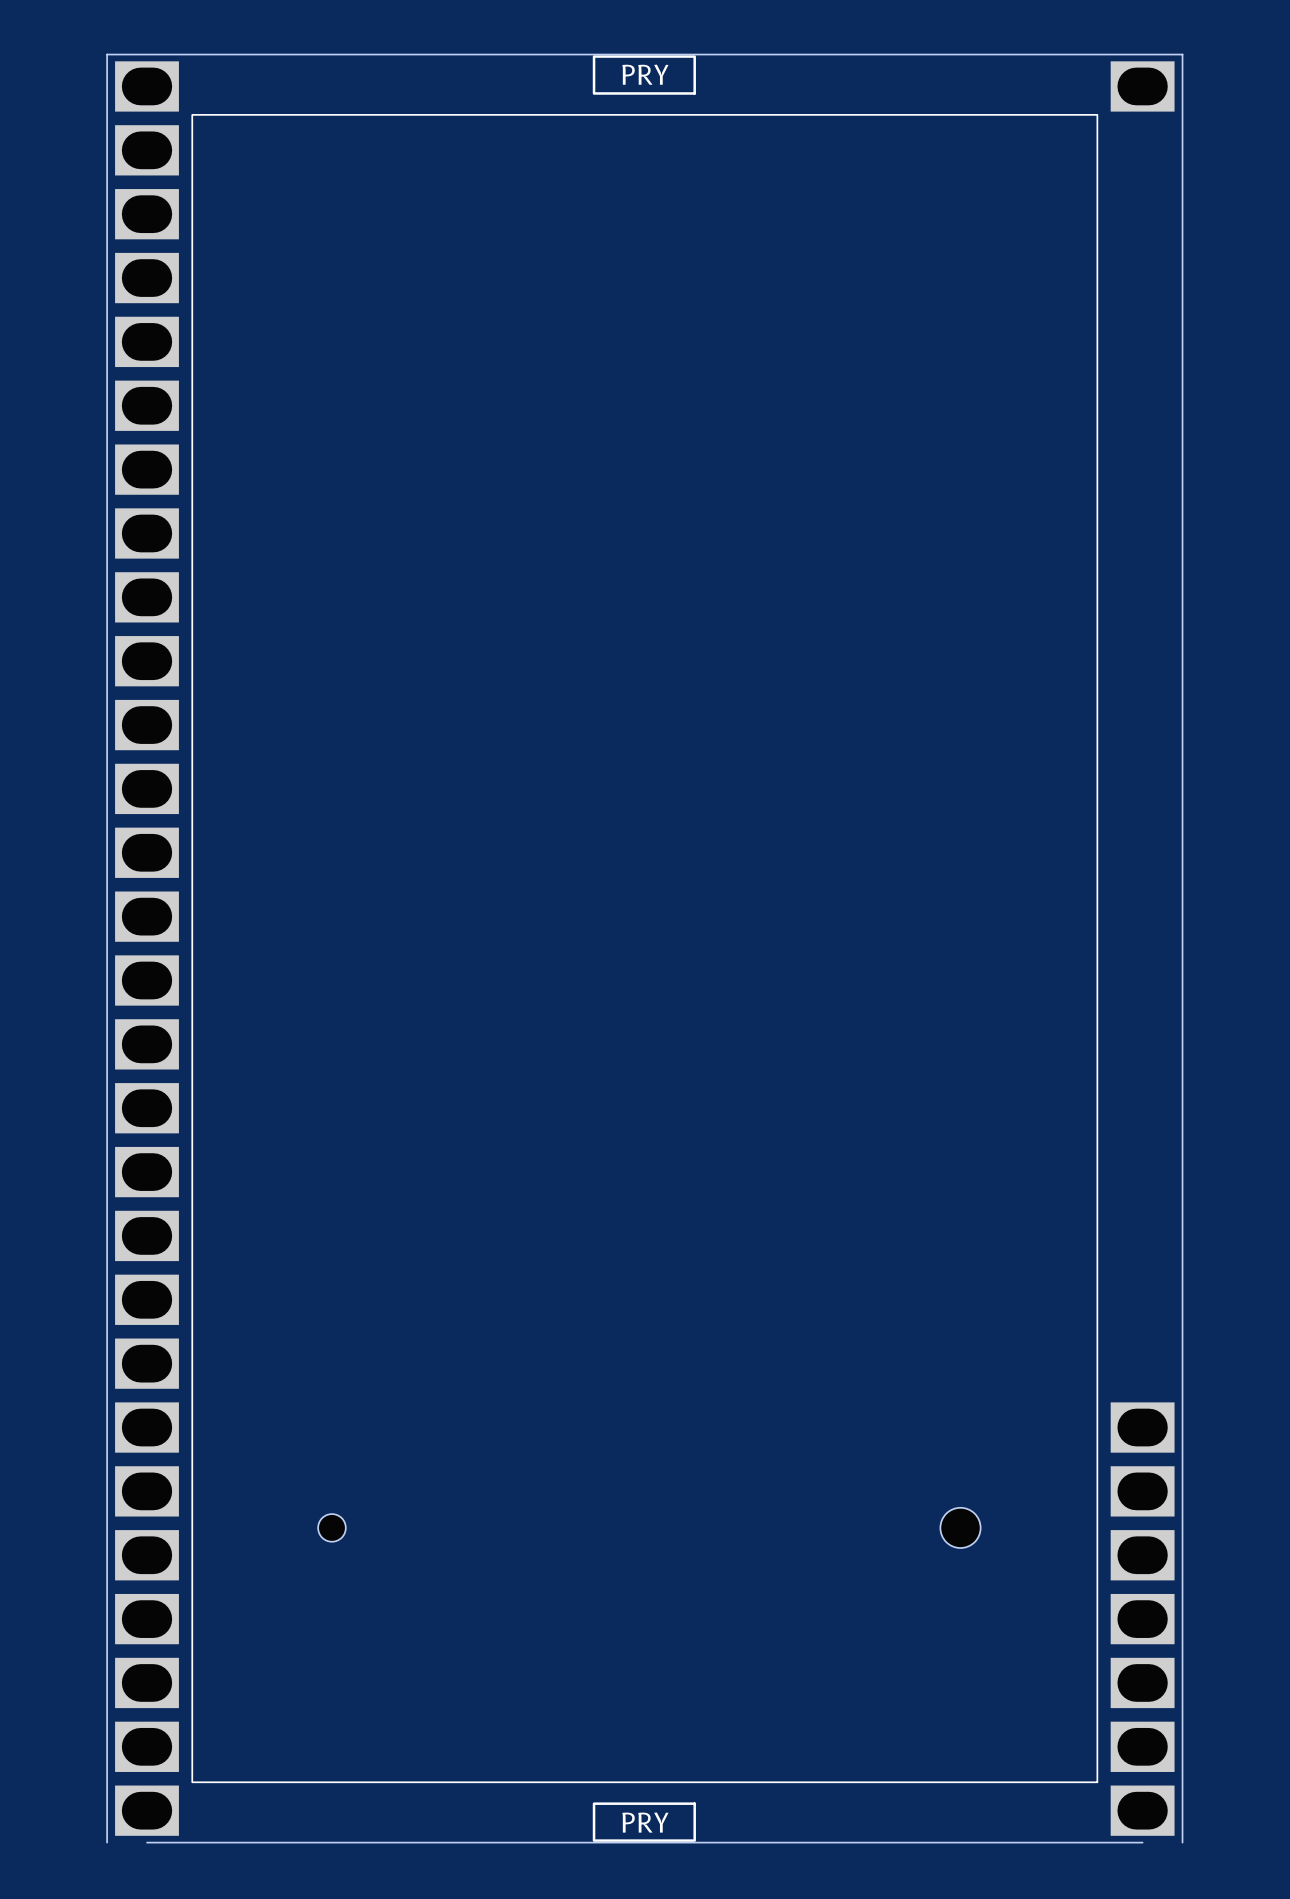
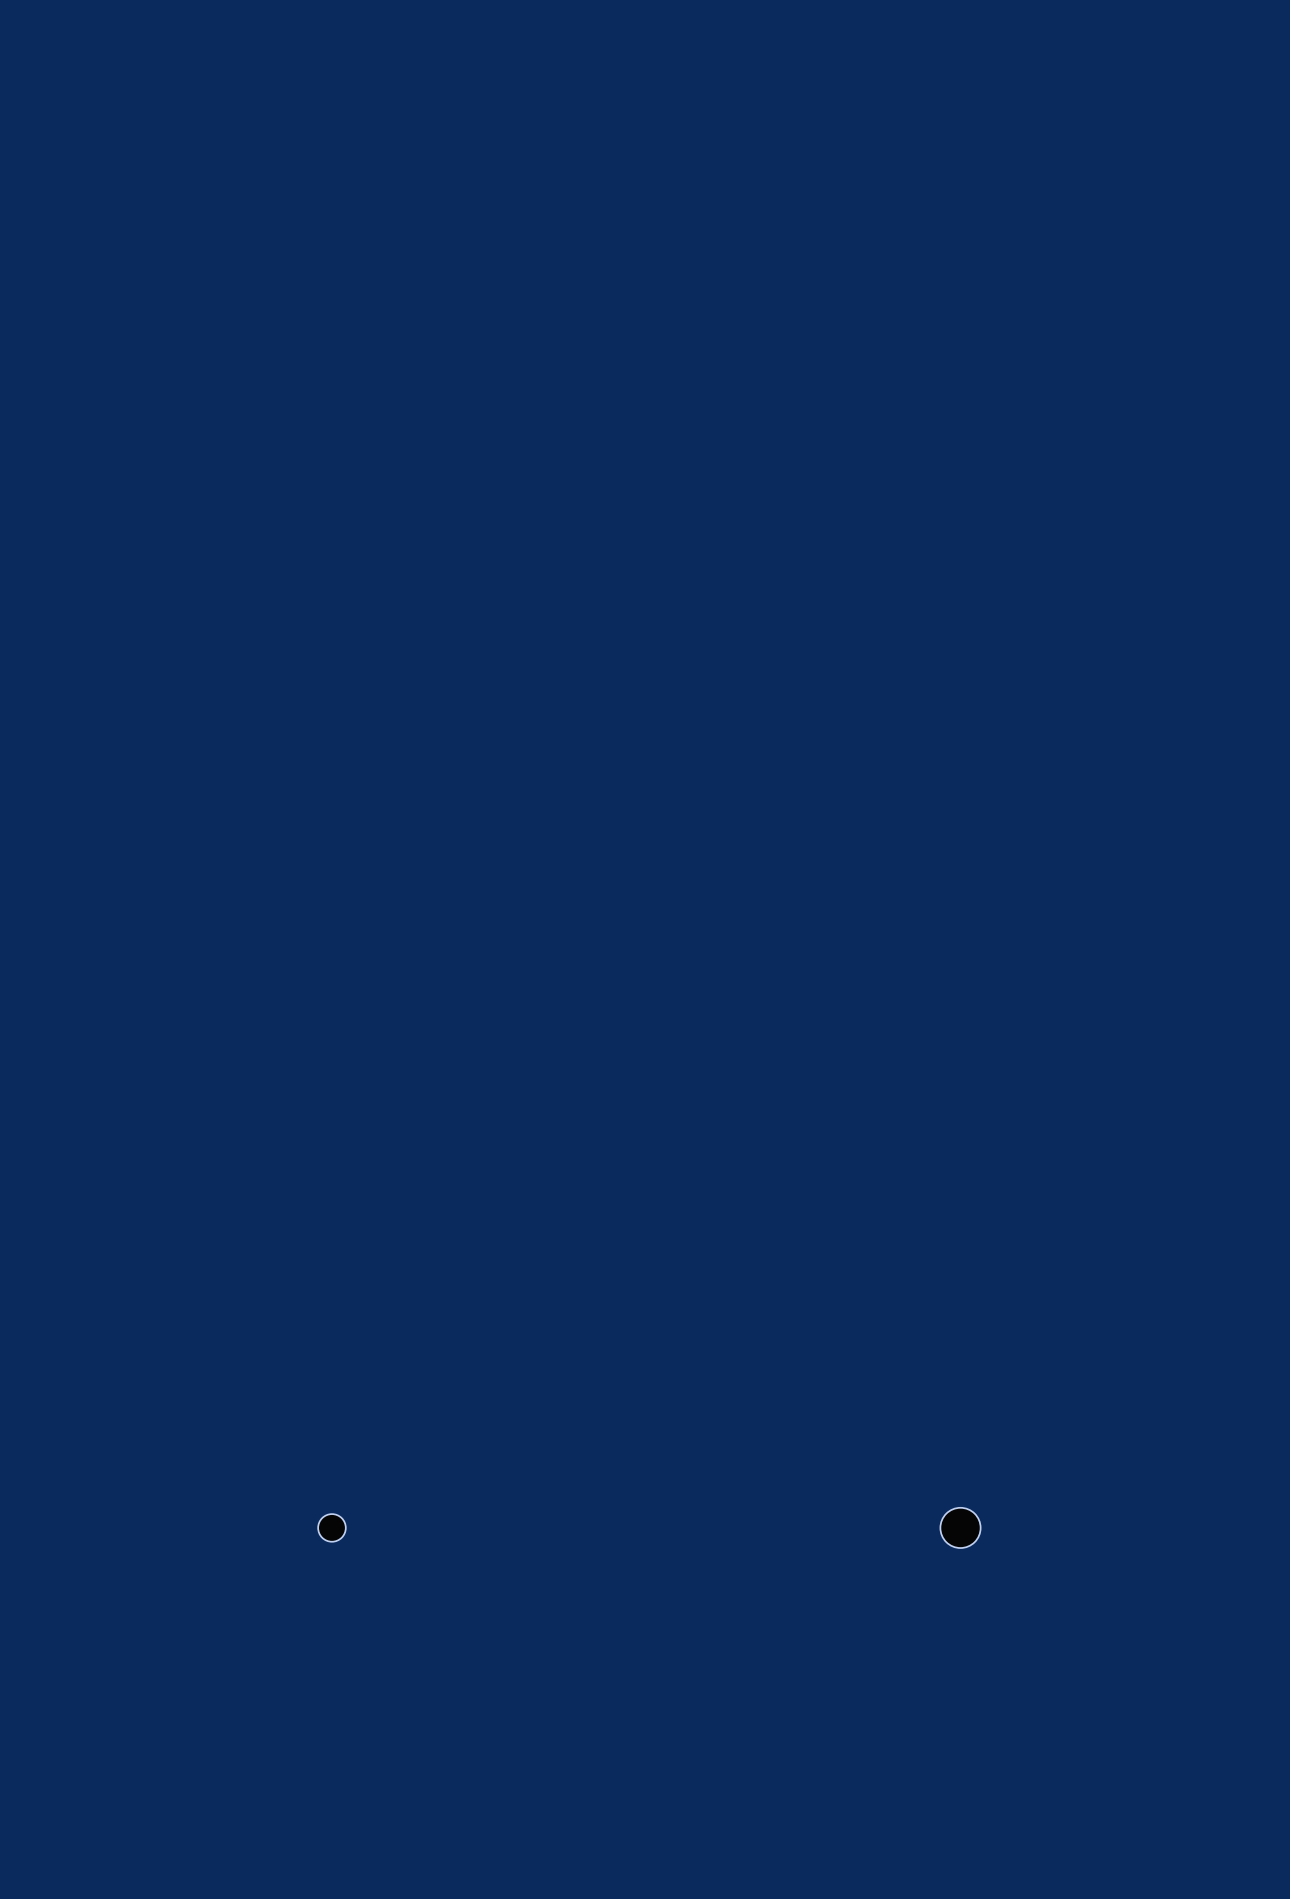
part: (644, 948) -> none

